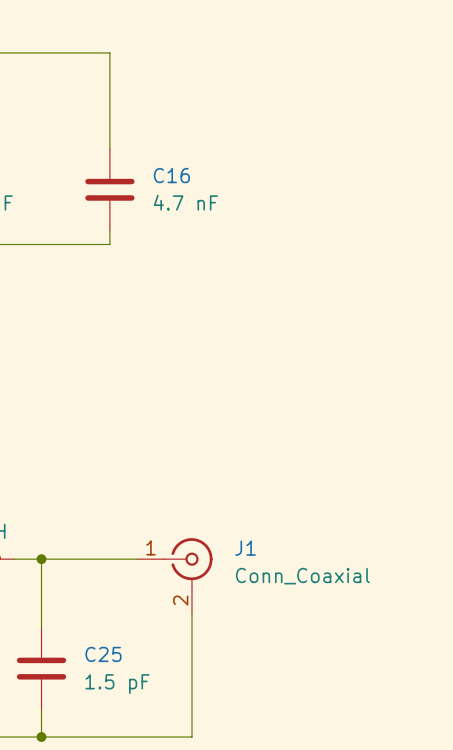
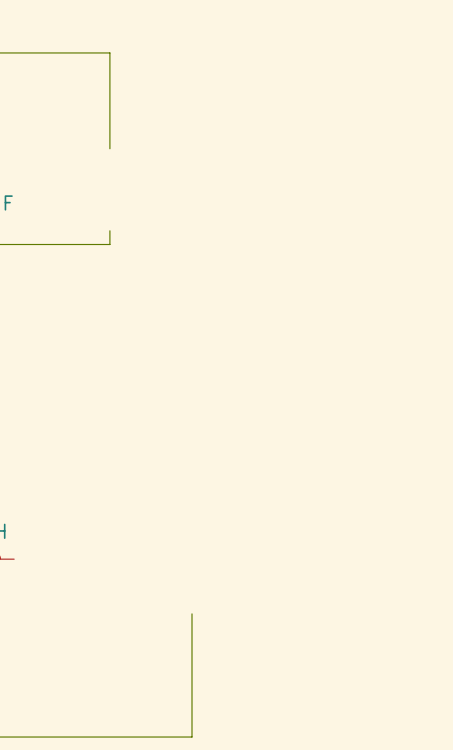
C16: 4.7 nF (109, 189) -> none
wire: (14, 559) (137, 559) -> none
wire: (41, 559) (41, 627) -> none
junction: (41, 559) -> none
J1: Conn_Coaxial (174, 576) -> none
C25: 1.5 pF (41, 668) -> none
wire: (41, 709) (41, 737) -> none
junction: (41, 737) -> none

